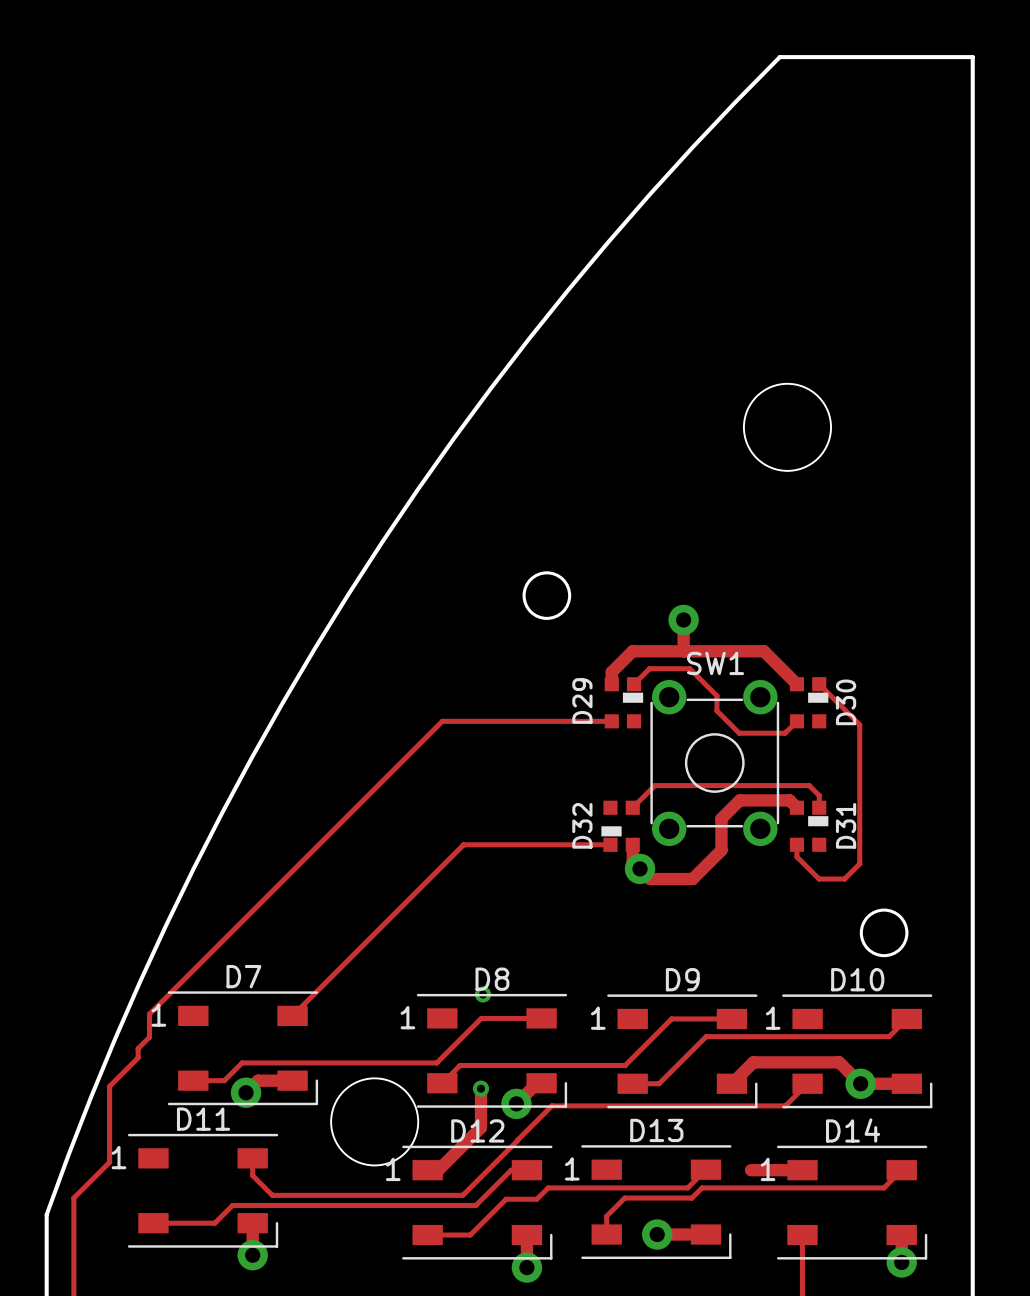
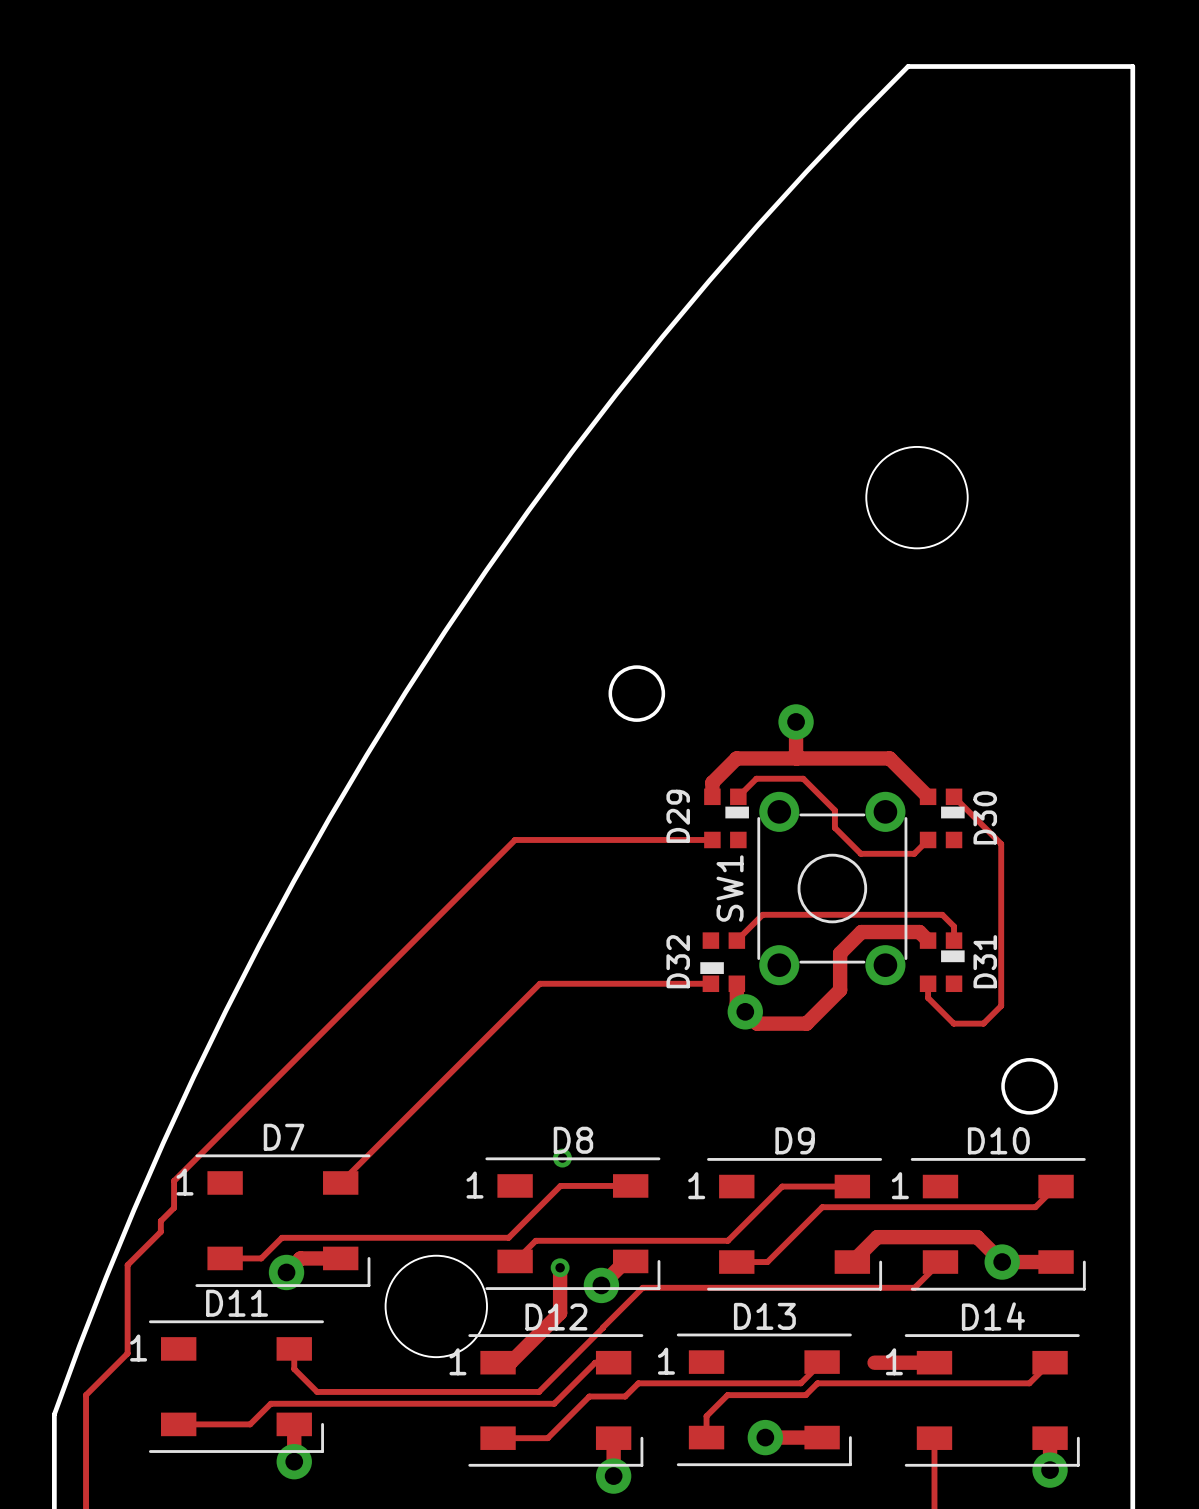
SW1 name rotation: 0° (715, 663) -> 90° counterclockwise (730, 888)
SW1 name position: SW1 (715, 663) -> SW1 (730, 888)

